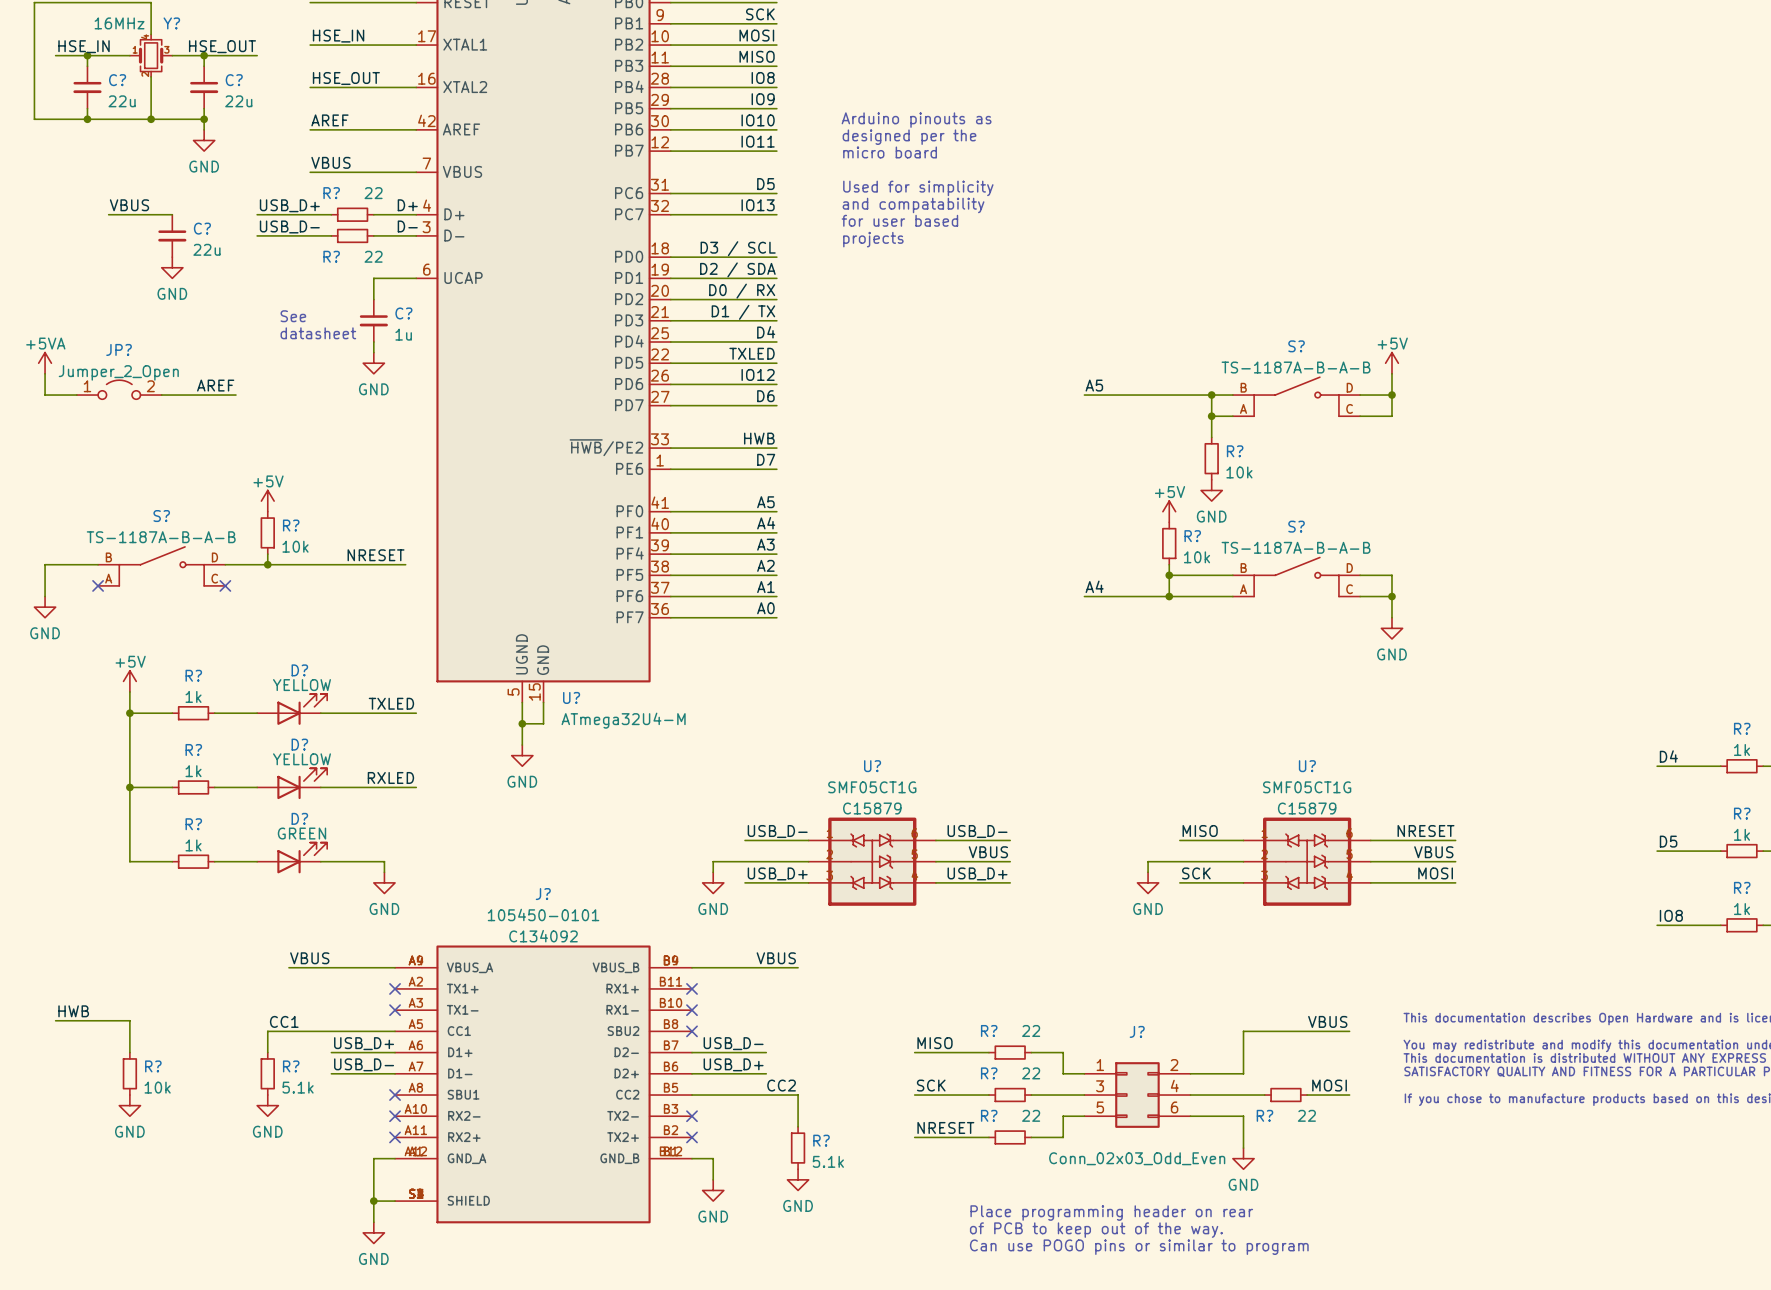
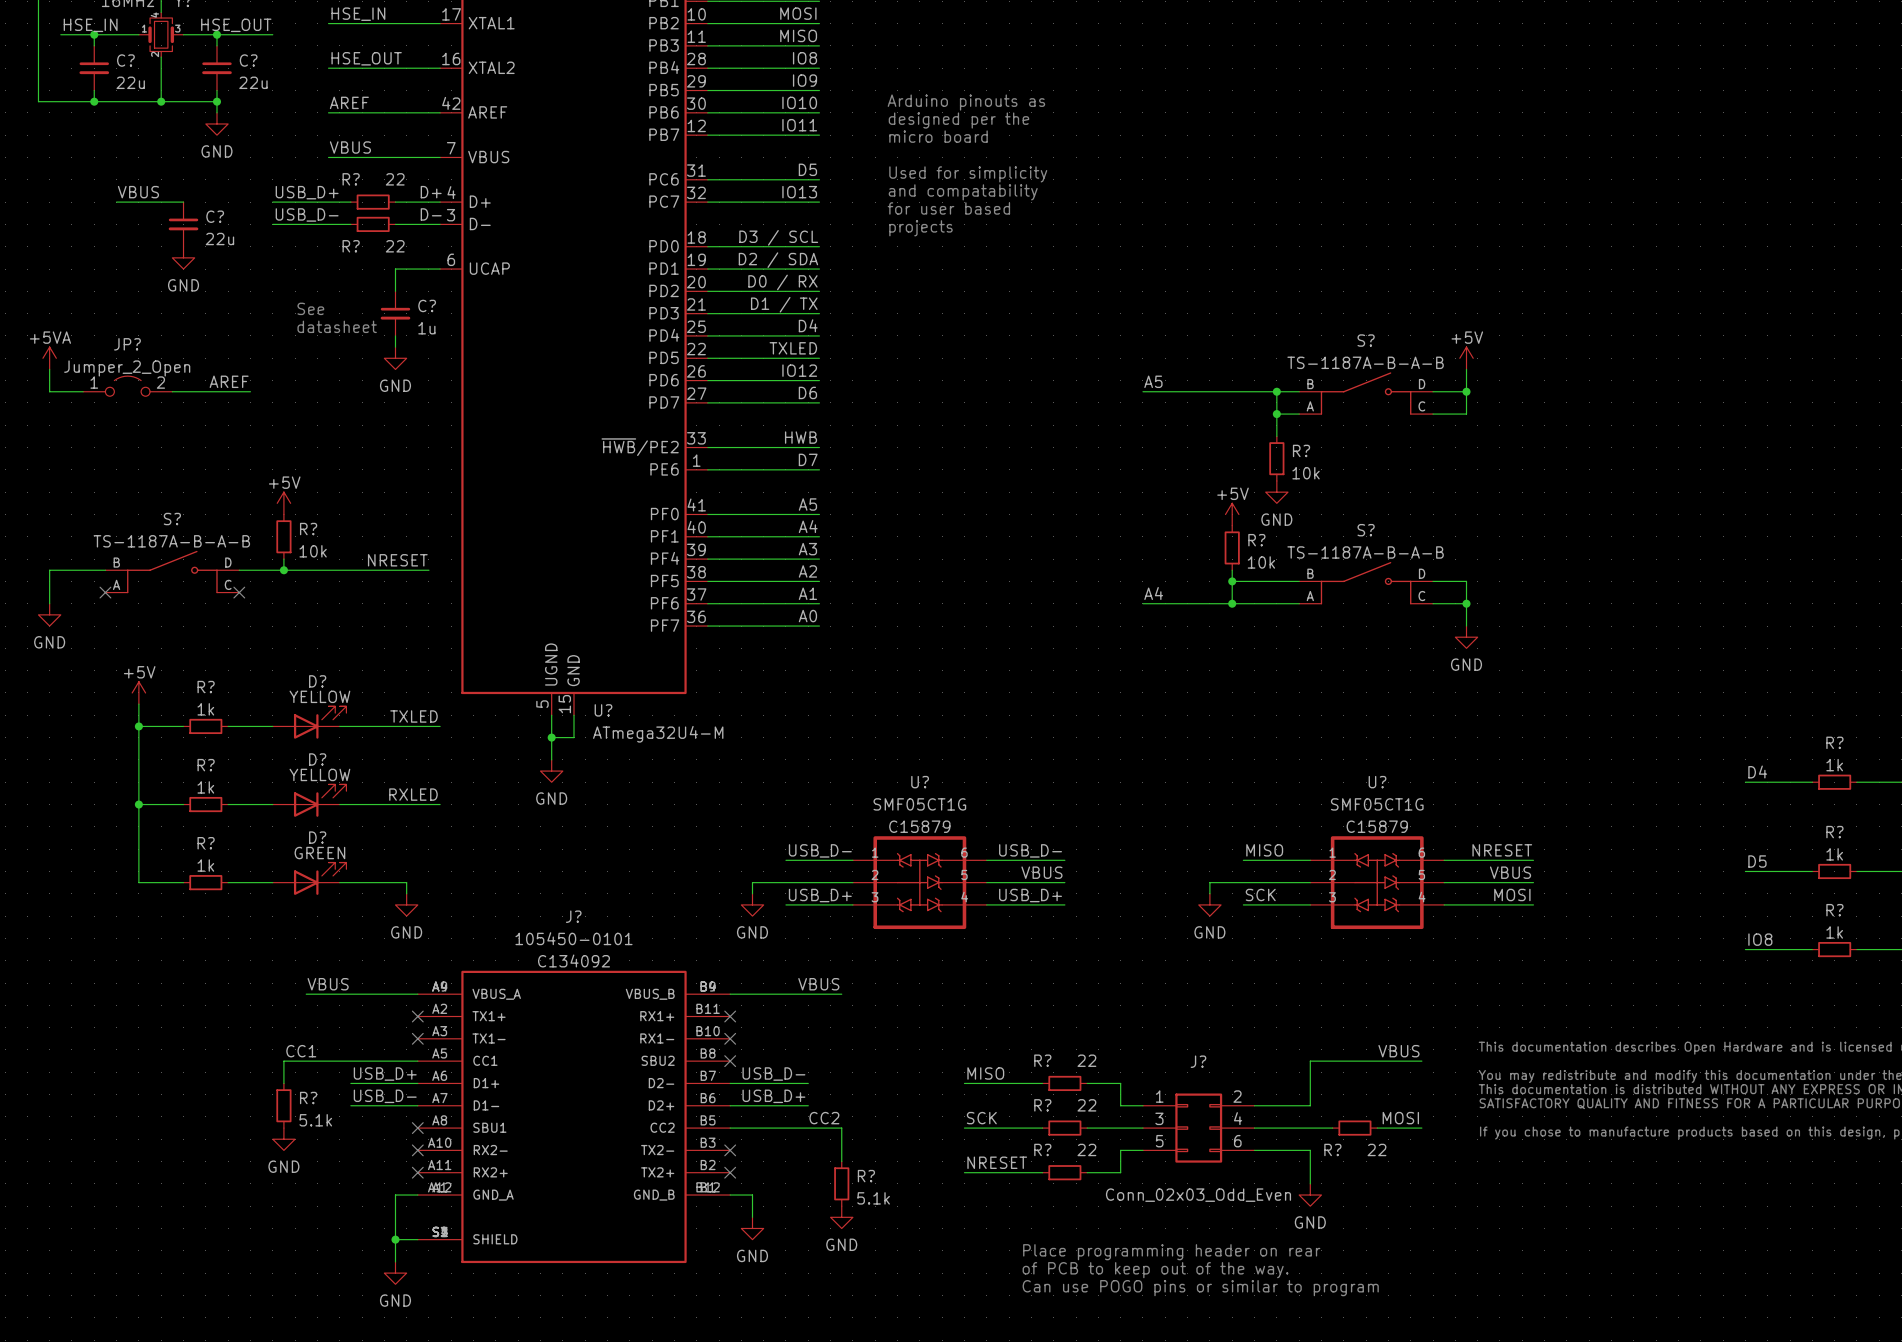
label: HWB (73, 1011) -> none
wire: (55, 1020) (129, 1020) (129, 1052) -> none
R?: 10k (129, 1073) -> none
power symbol: GND (129, 1105) -> none

